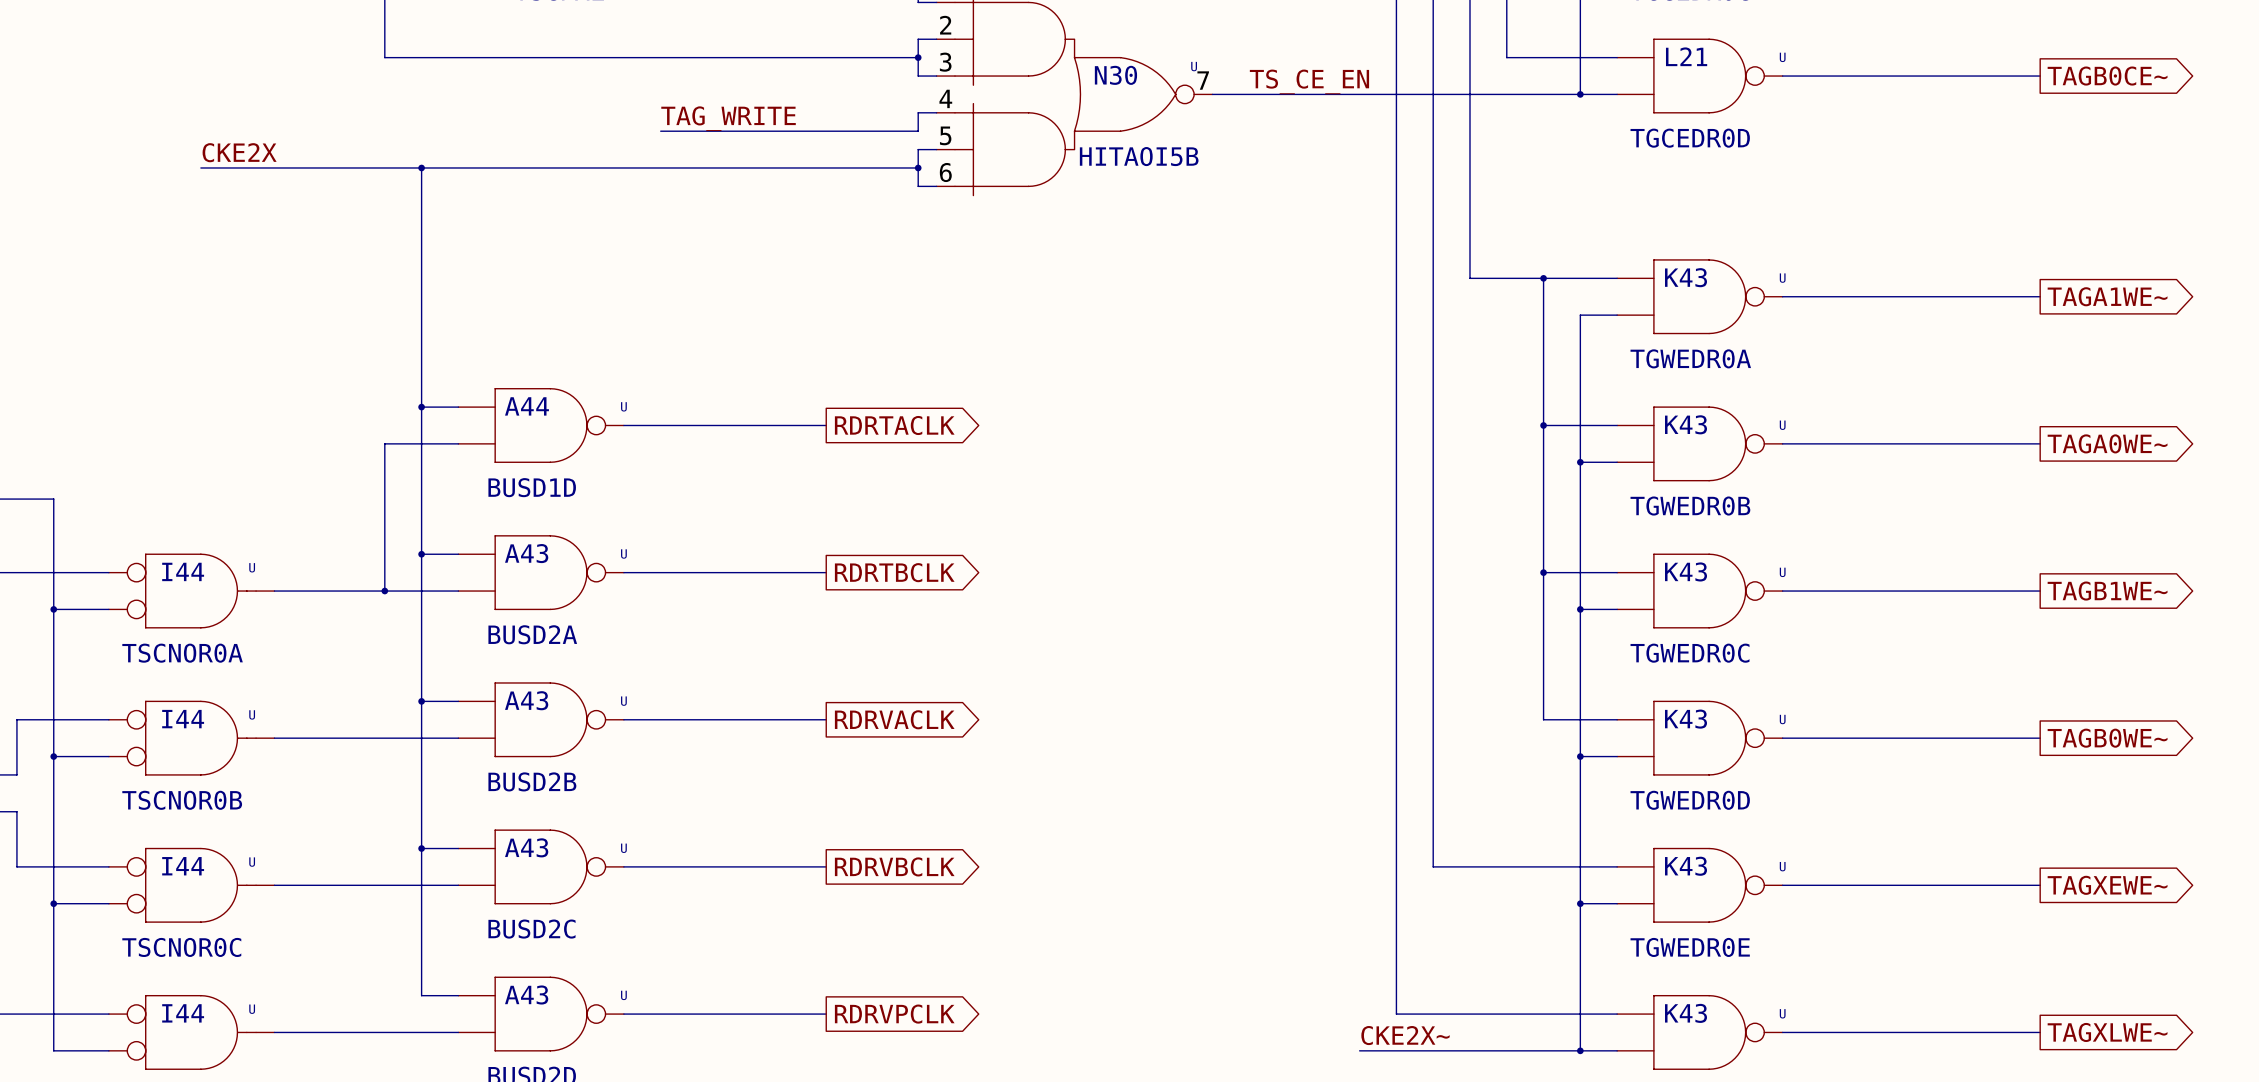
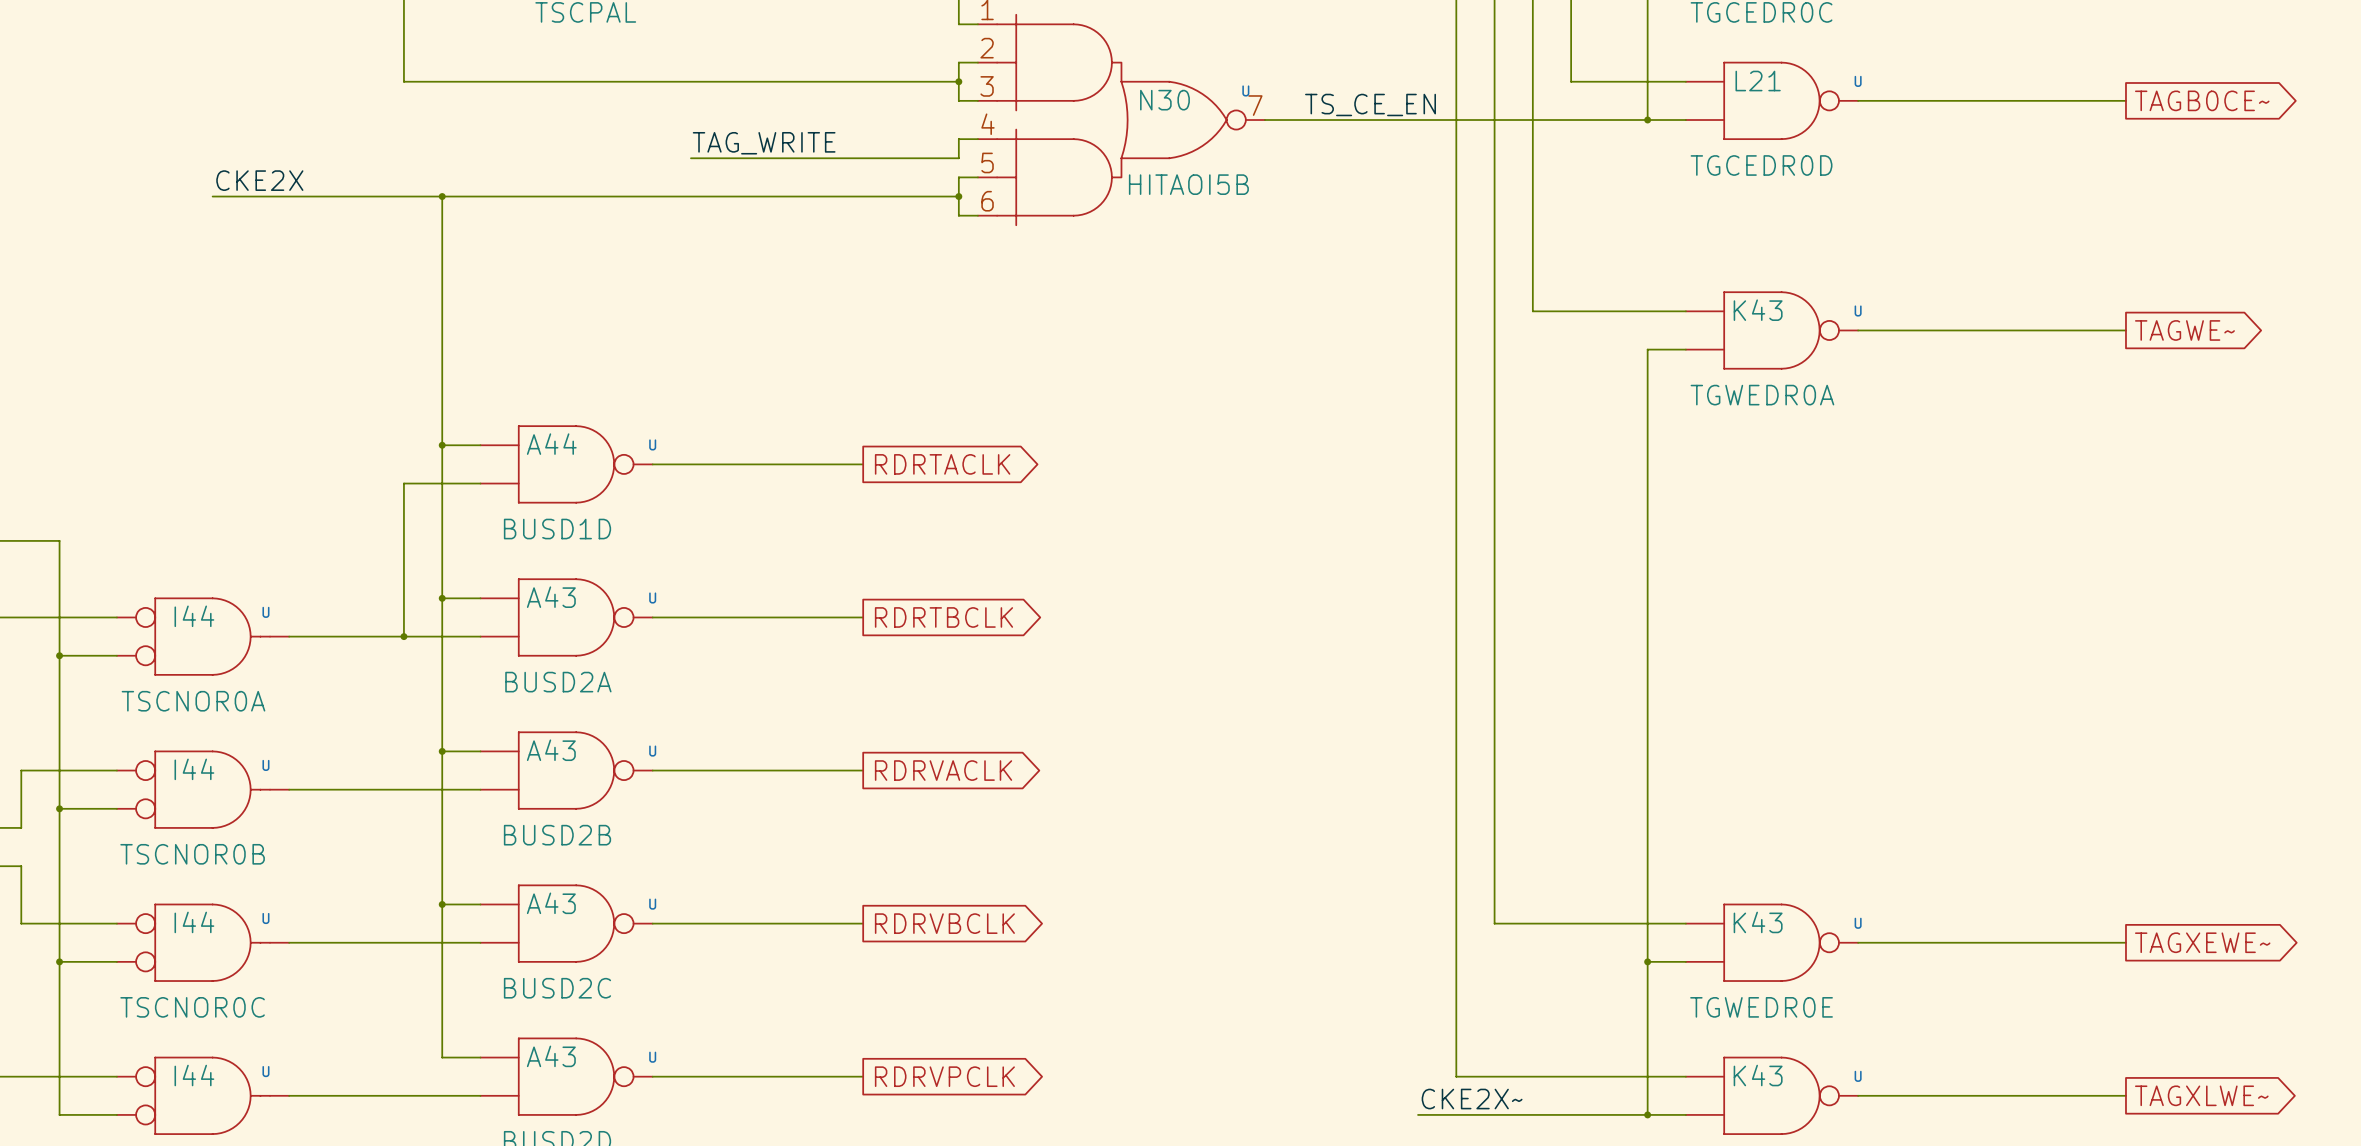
wire: (1543, 278) (1543, 719) (1617, 719) -> none
junction: (1543, 278) -> none
global label: TAGA1WE~ (2107, 296) -> TAGWE~ (2184, 330)
wire: (1543, 425) (1617, 425) -> none
junction: (1543, 425) -> none
U: (1699, 443) -> none
wire: (1782, 443) (2040, 443) -> none
global label: TAGA0WE~ (2107, 443) -> none
wire: (1580, 462) (1617, 462) -> none
junction: (1580, 462) -> none
wire: (1543, 572) (1617, 572) -> none
junction: (1543, 572) -> none
U: (1699, 591) -> none
wire: (1782, 591) (2040, 591) -> none
global label: TAGB1WE~ (2107, 591) -> none
wire: (1580, 609) (1617, 609) -> none
junction: (1580, 609) -> none
U: (1699, 738) -> none
wire: (1782, 738) (2040, 738) -> none
global label: TAGB0WE~ (2107, 738) -> none
wire: (1580, 756) (1617, 756) -> none
junction: (1580, 756) -> none

